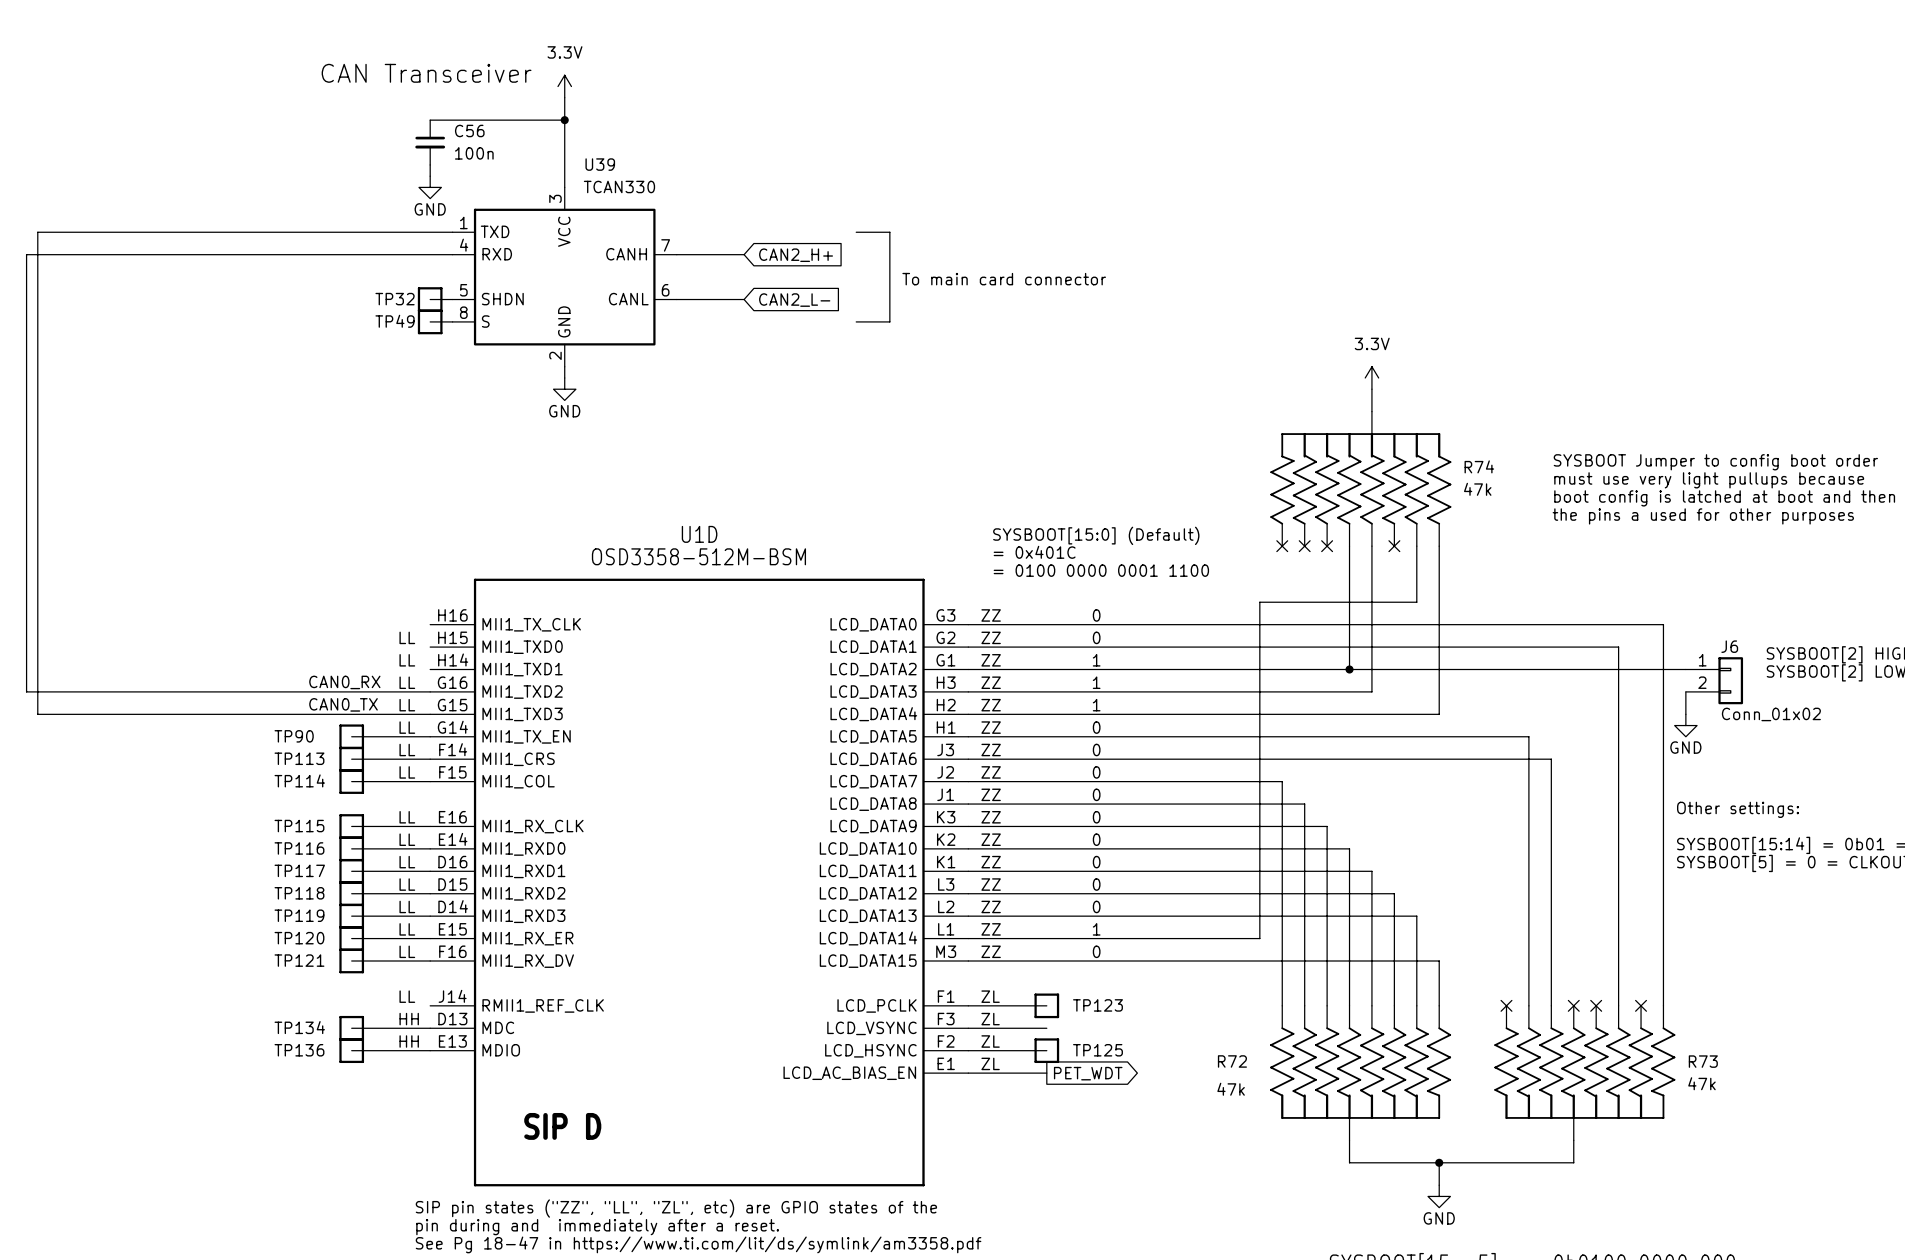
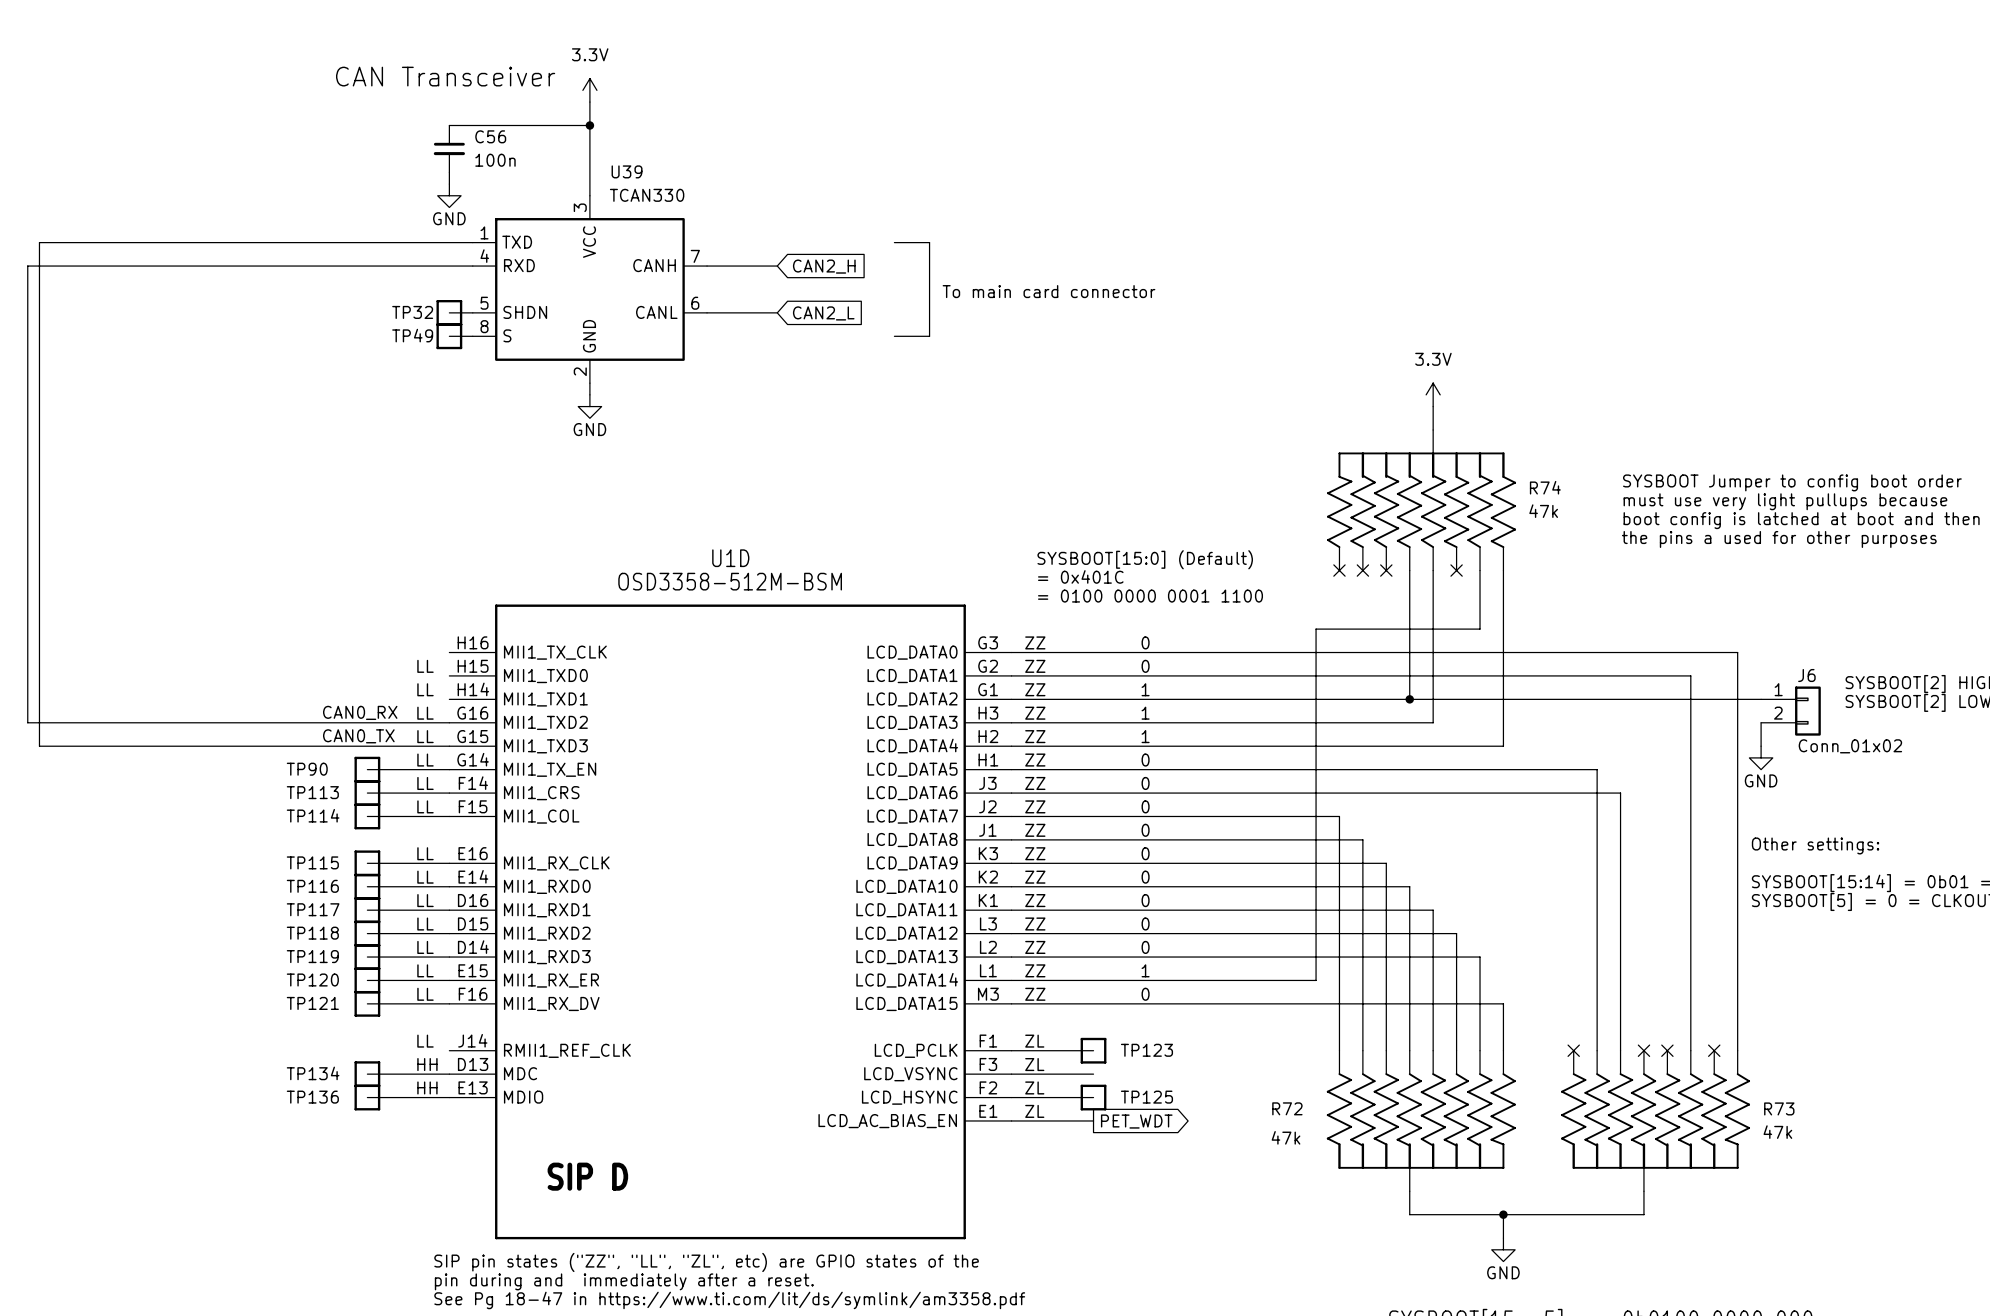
global label: CAN2_H+ (796, 255) -> CAN2_H (824, 266)
global label: CAN2_L- (794, 300) -> CAN2_L (823, 313)

